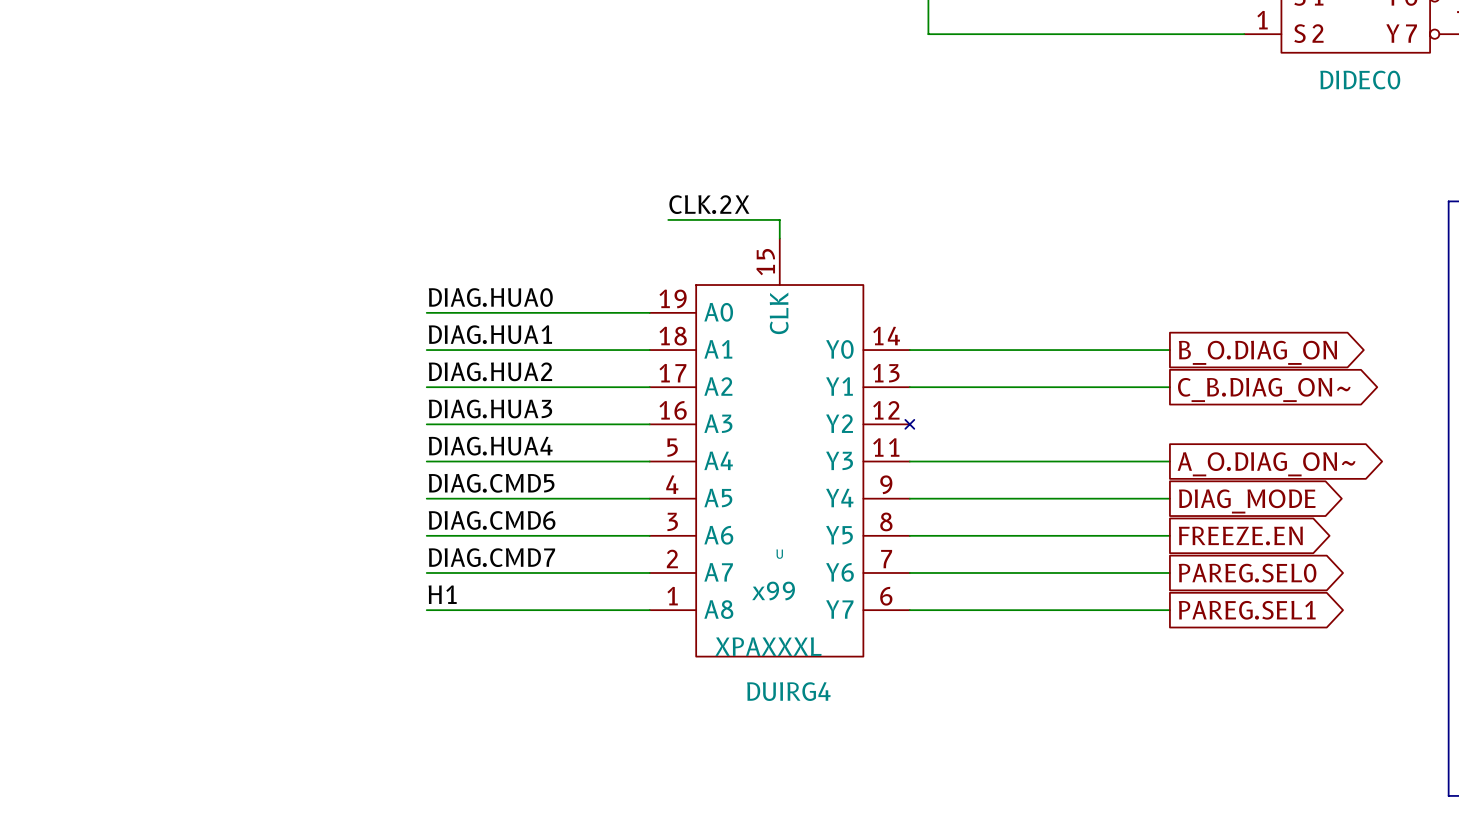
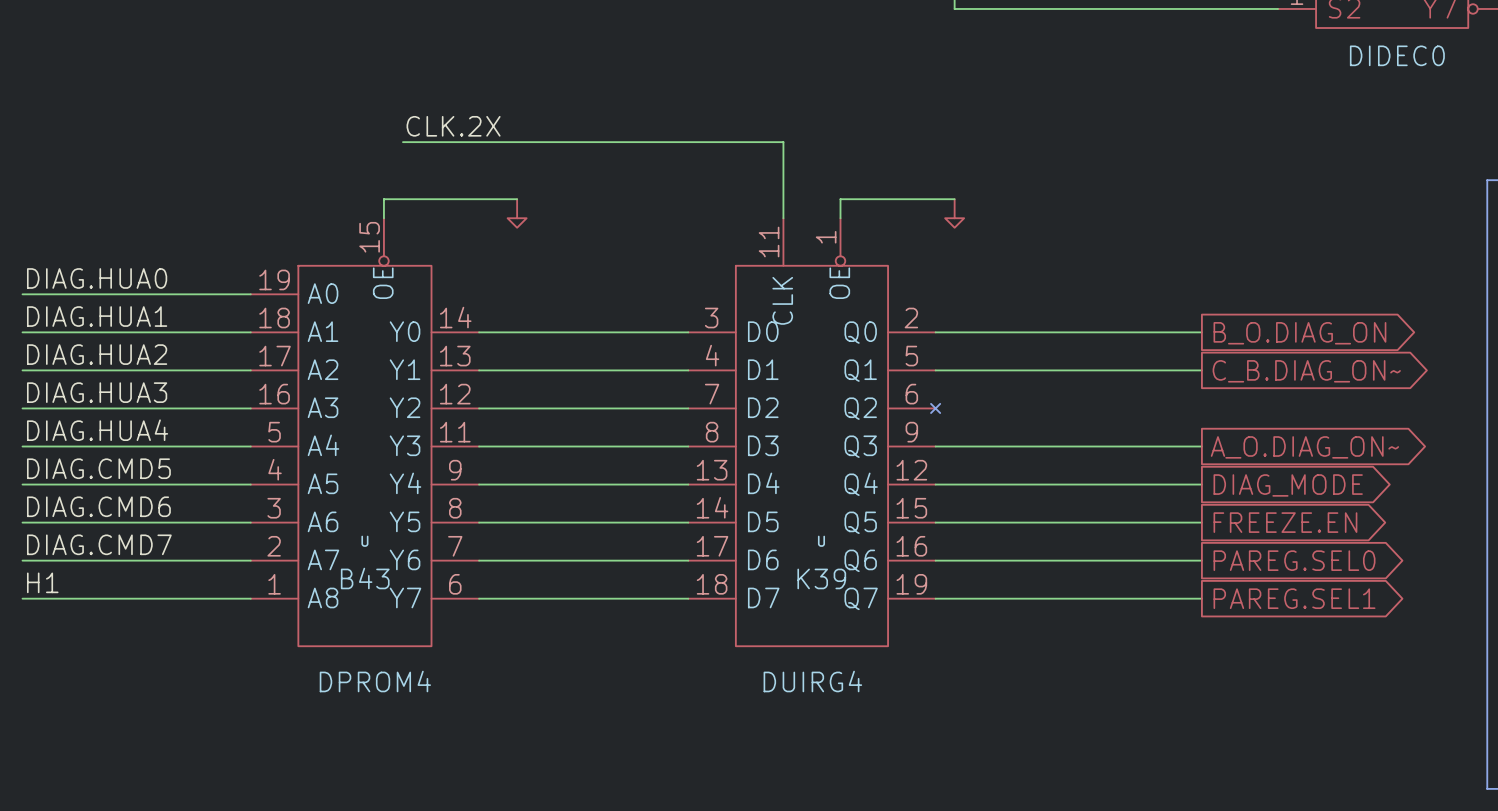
label: none -> CLK.2X (453, 126)
wire: none -> (402, 142) (783, 142) (783, 218)
label: CLK.2X (709, 204) -> none
wire: none -> (517, 199) (383, 199) (383, 218)
wire: (668, 219) (779, 219) (779, 238) -> none
wire: none -> (954, 199) (840, 199) (840, 218)
power symbol: none -> (517, 213)
power symbol: none -> (954, 213)
label: none -> DIAG.HUA0 (97, 278)
label: DIAG.HUA0 (490, 297) -> none
wire: none -> (22, 294) (250, 294)
wire: (426, 312) (649, 312) -> none
label: none -> DIAG.HUA1 (97, 316)
label: DIAG.HUA1 (490, 334) -> none
wire: none -> (22, 332) (250, 332)
label: none -> DIAG.HUA2 (97, 354)
label: DIAG.HUA2 (490, 371) -> none
wire: none -> (22, 370) (250, 370)
label: none -> DIAG.HUA3 (97, 392)
label: DIAG.HUA3 (490, 408) -> none
wire: none -> (22, 408) (250, 408)
label: none -> DIAG.HUA4 (97, 430)
label: DIAG.HUA4 (490, 446) -> none
U: none -> (364, 432)
U: XPAXXXL (779, 447) -> none
U: none -> (811, 432)
wire: none -> (22, 446) (250, 446)
label: none -> DIAG.CMD5 (98, 468)
label: DIAG.CMD5 (491, 483) -> none
wire: none -> (22, 484) (250, 484)
label: none -> DIAG.CMD6 (98, 506)
label: DIAG.CMD6 (492, 520) -> none
wire: none -> (22, 522) (250, 522)
label: none -> DIAG.CMD7 (99, 544)
label: DIAG.CMD7 (491, 557) -> none
wire: none -> (22, 560) (250, 560)
label: none -> H1 (42, 582)
label: H1 (442, 594) -> none
wire: none -> (22, 598) (250, 598)

